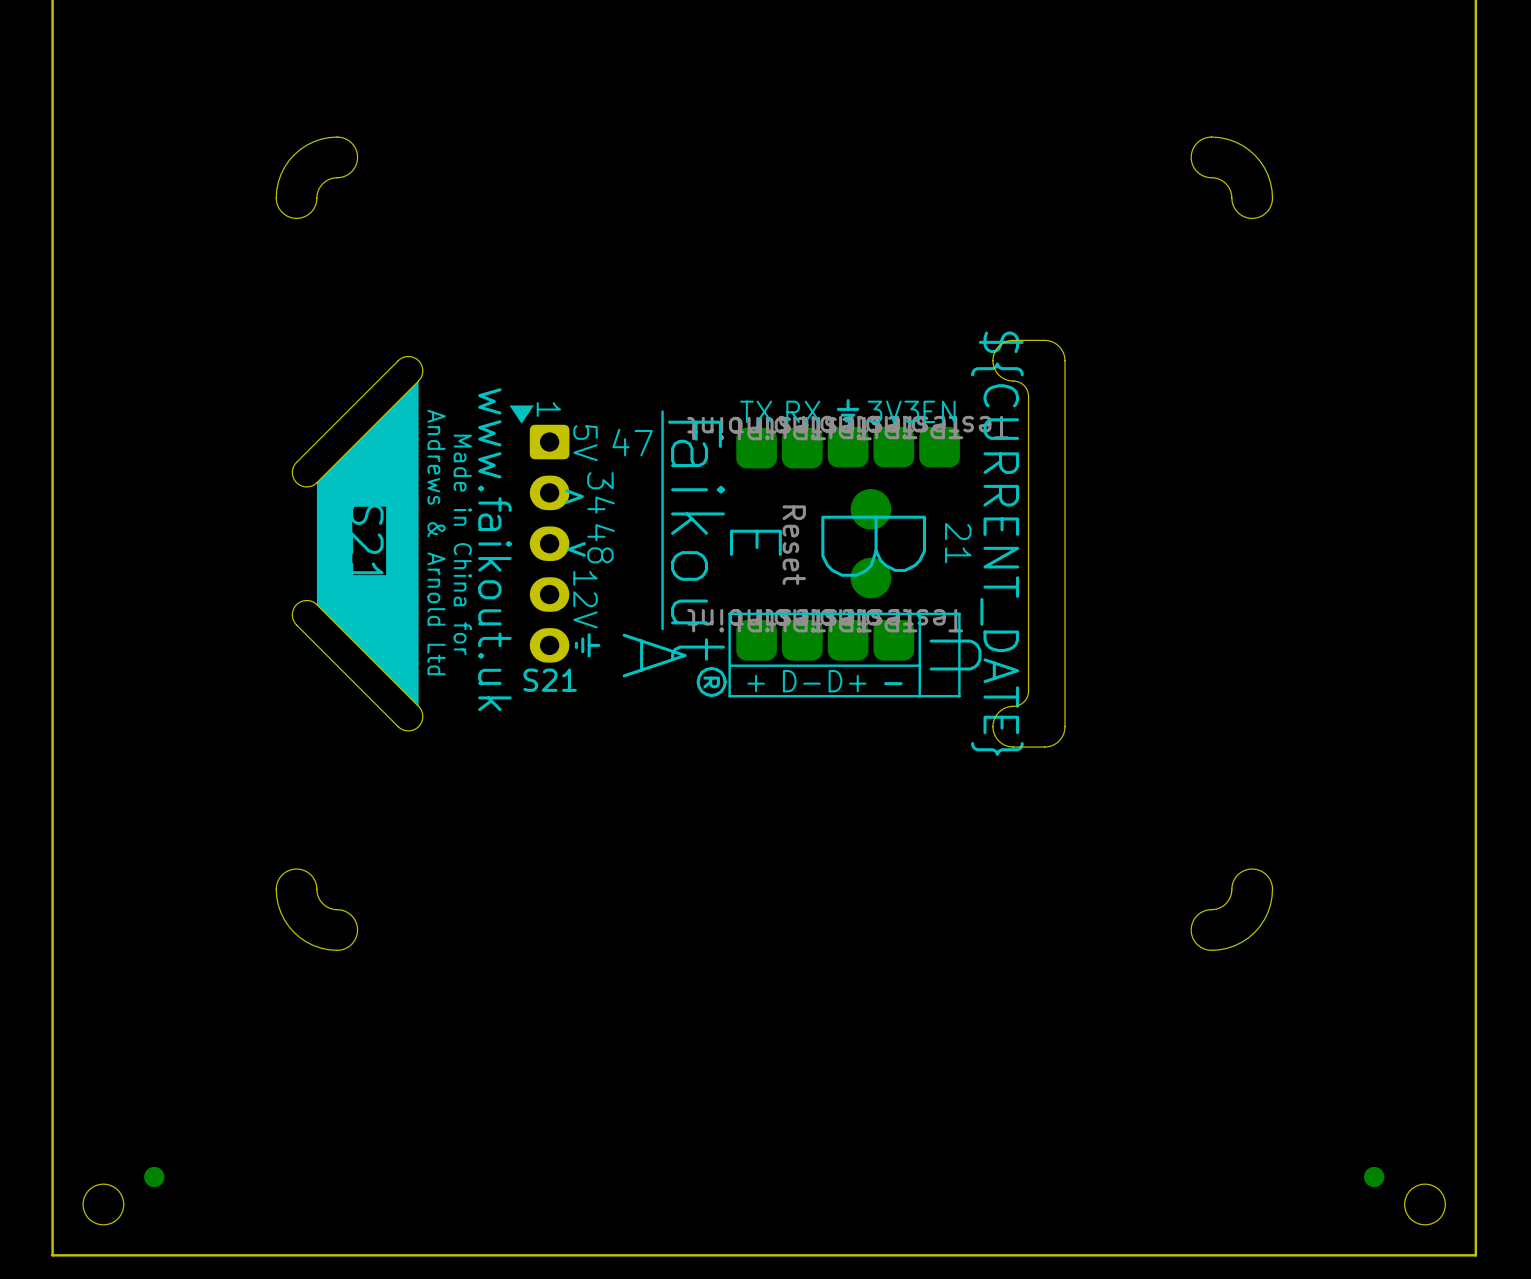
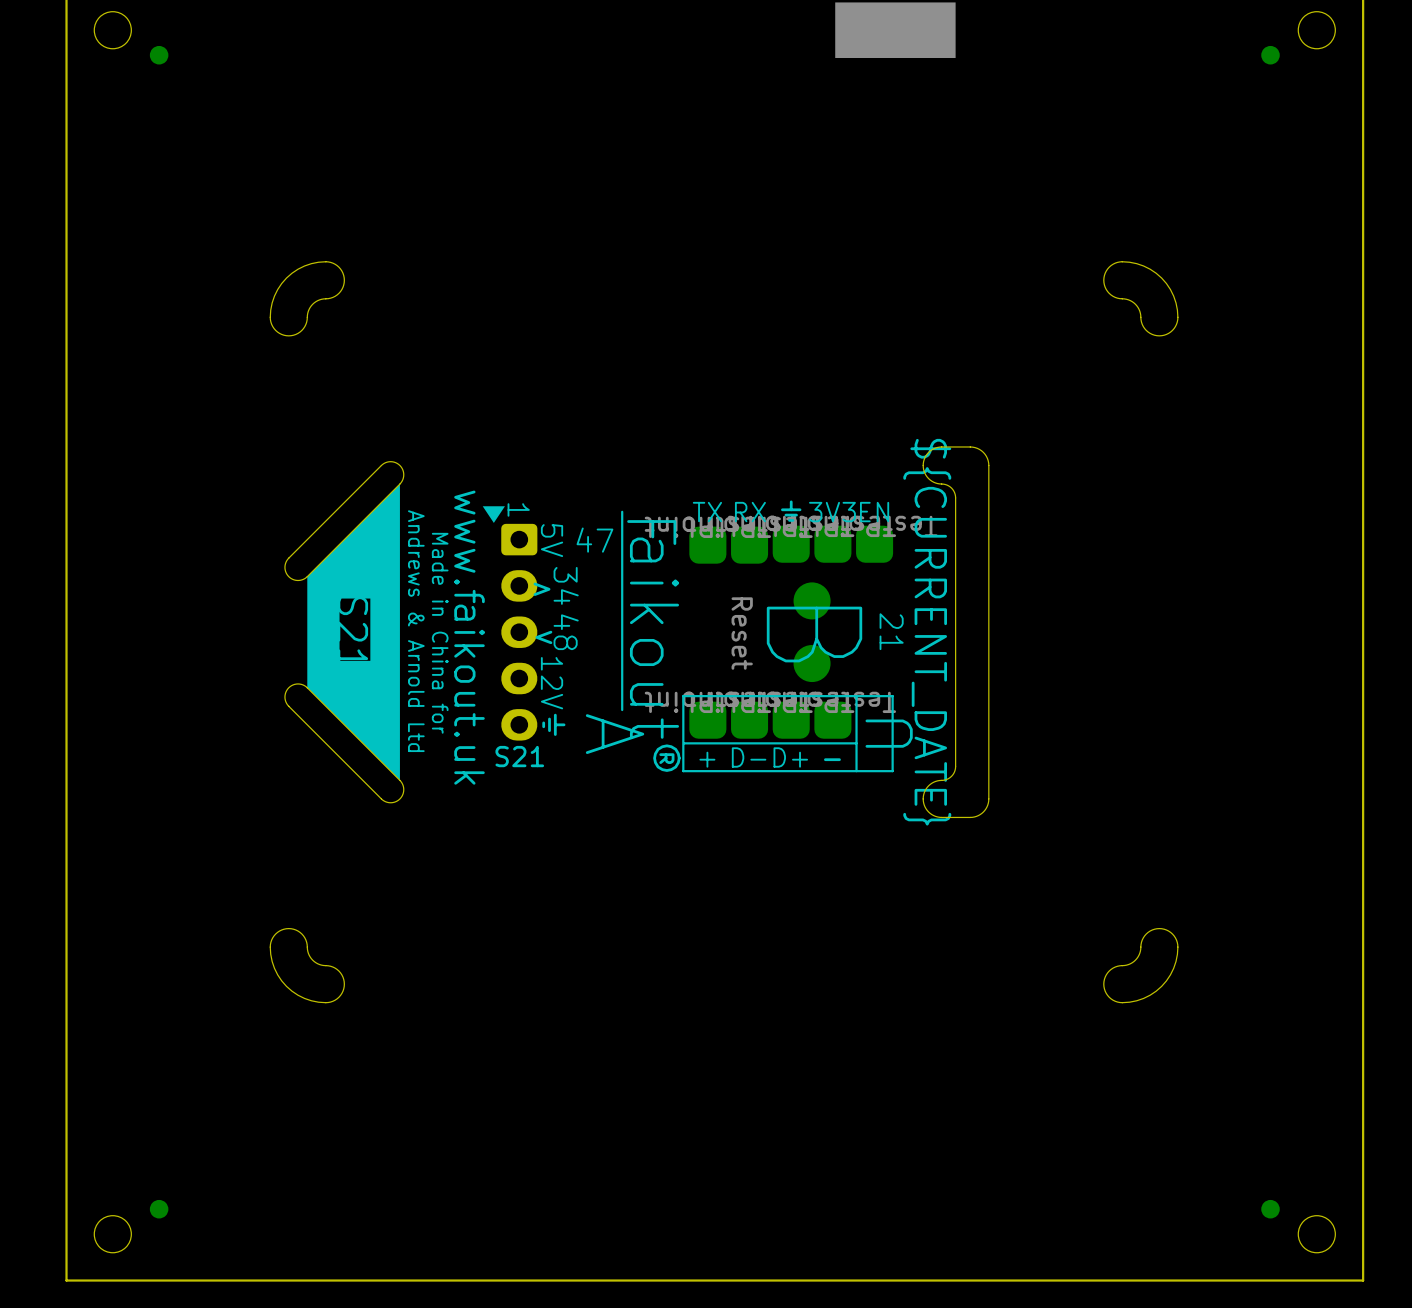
text: E (755, 542) -> none

